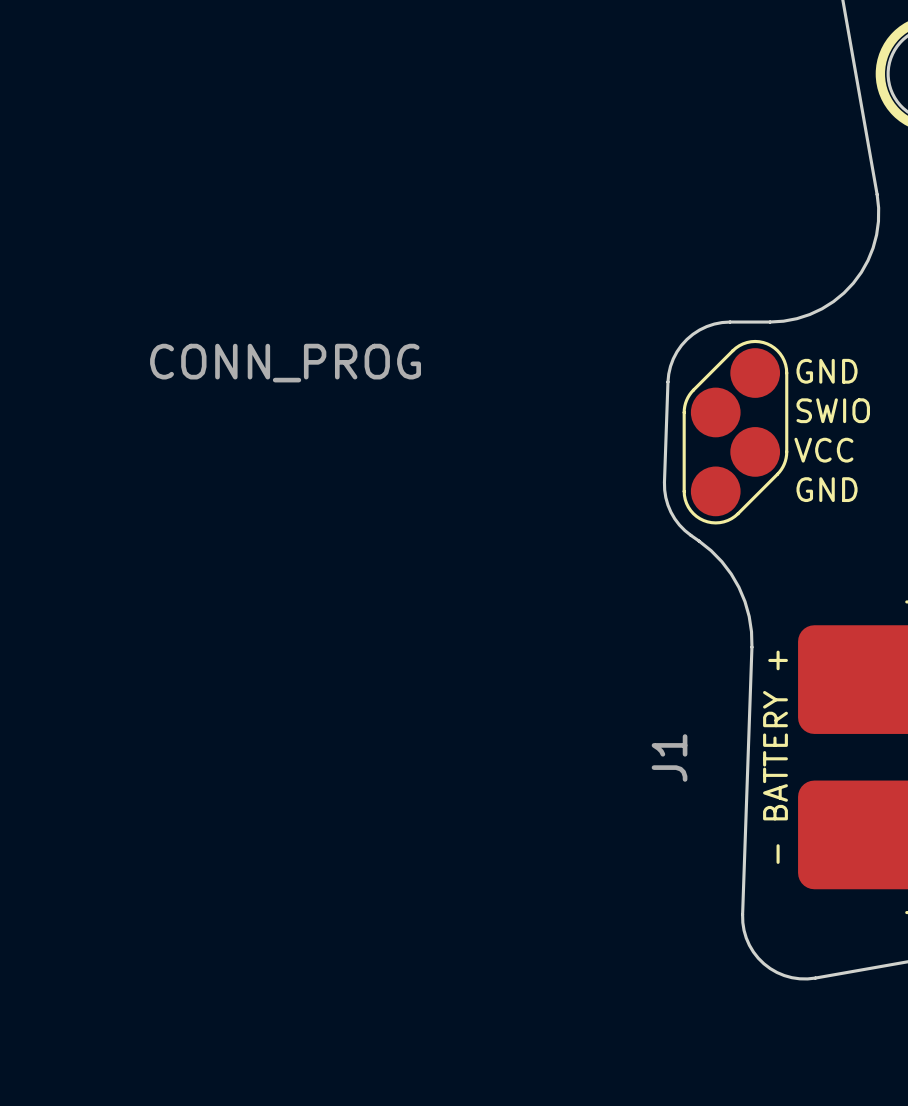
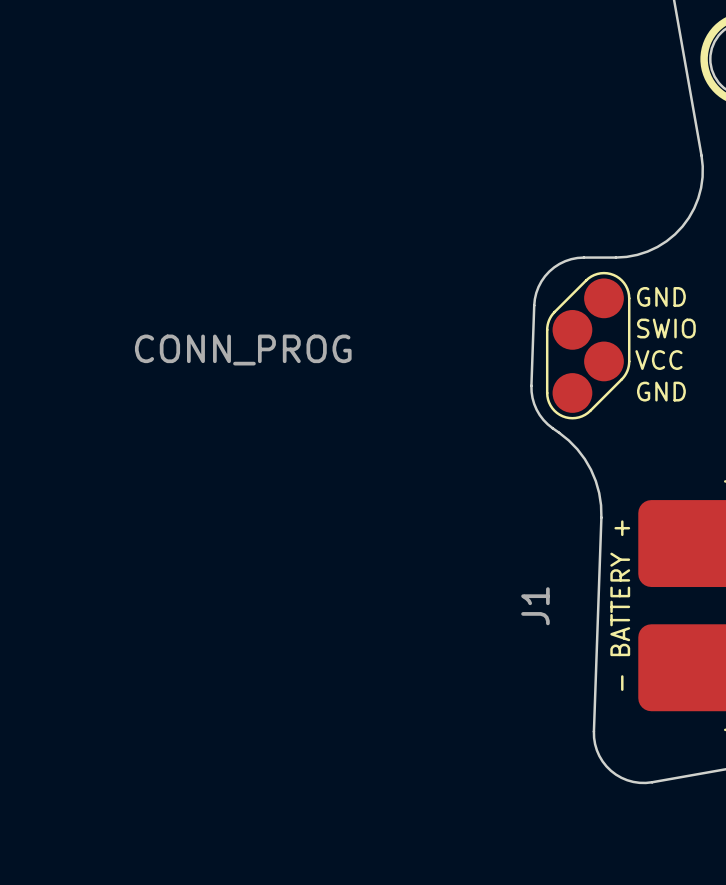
part value position: CONN_PROG (285, 363) -> CONN_PROG (243, 350)

